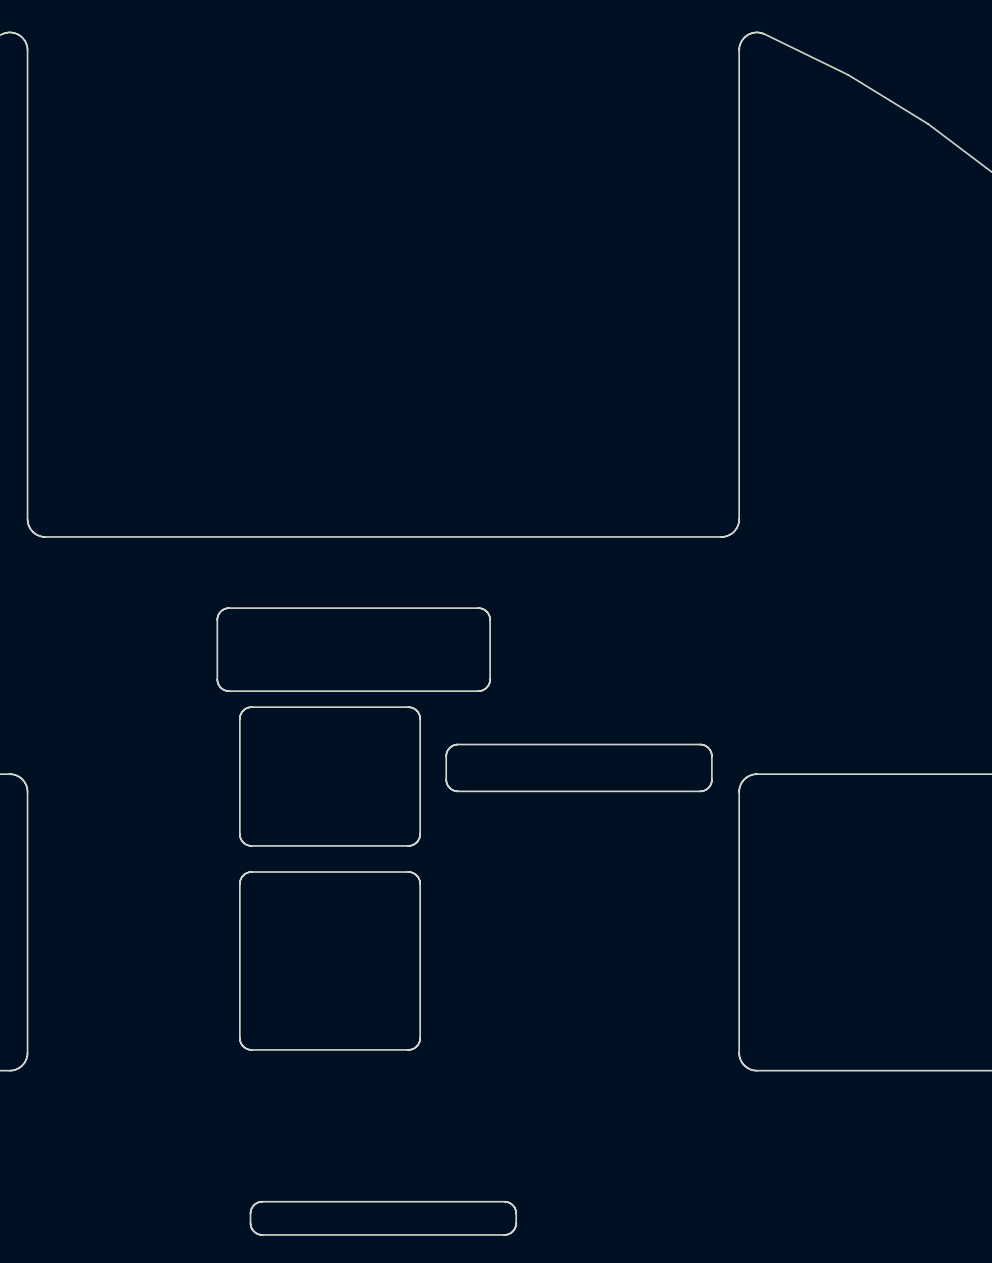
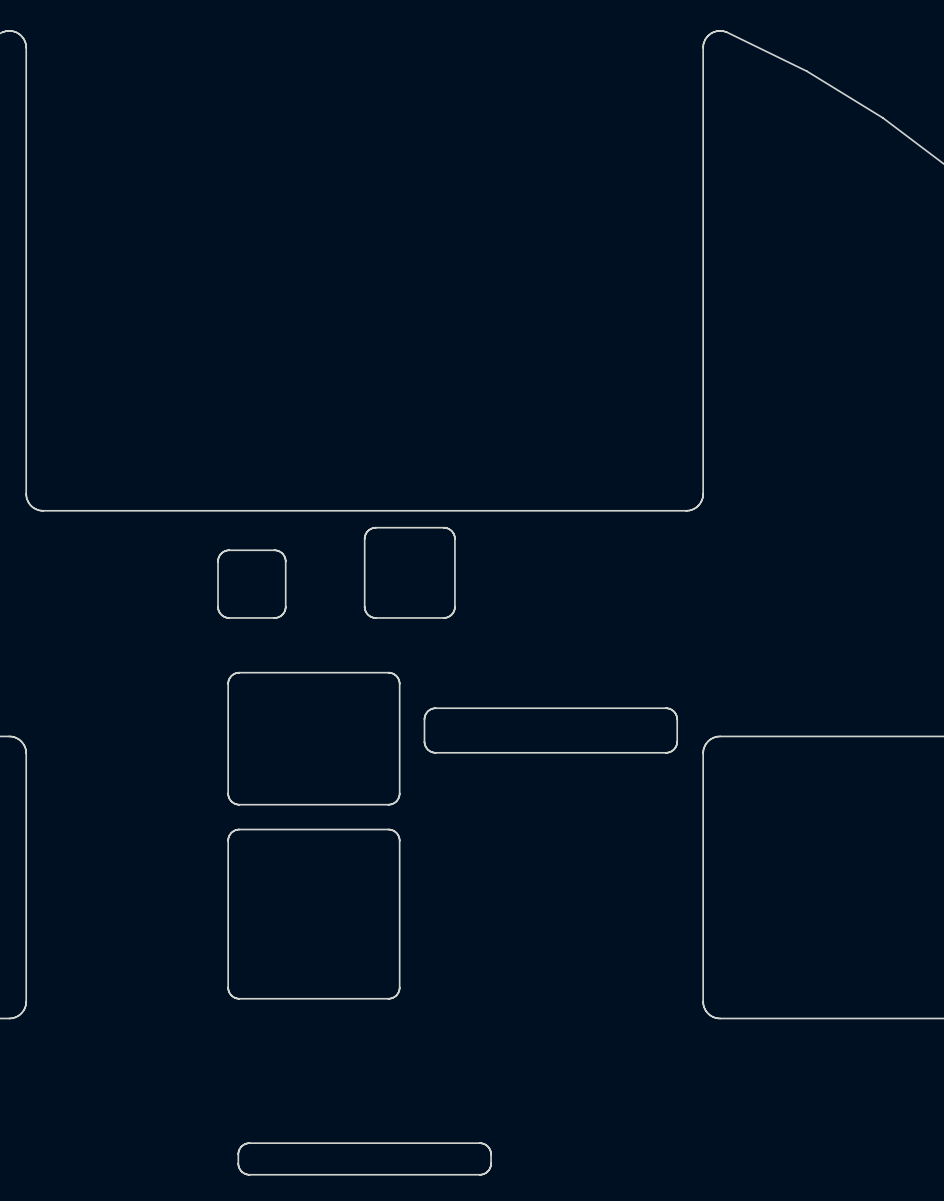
board edge: none -> (374, 527) (444, 527) (451, 530) (454, 537) (454, 607) (451, 614) (444, 617) (374, 617) (367, 614) (364, 607) (364, 537) (367, 530) (374, 527)
board edge: none -> (228, 550) (275, 550) (283, 554) (285, 560) (285, 607) (281, 615) (275, 617) (228, 617) (220, 613) (218, 607) (218, 560) (221, 553) (228, 550)
board edge: (228, 608) (481, 608) (487, 612) (490, 618) (489, 682) (485, 688) (479, 691) (226, 690) (220, 686) (217, 680) (217, 618) (220, 611) (228, 608) -> none

